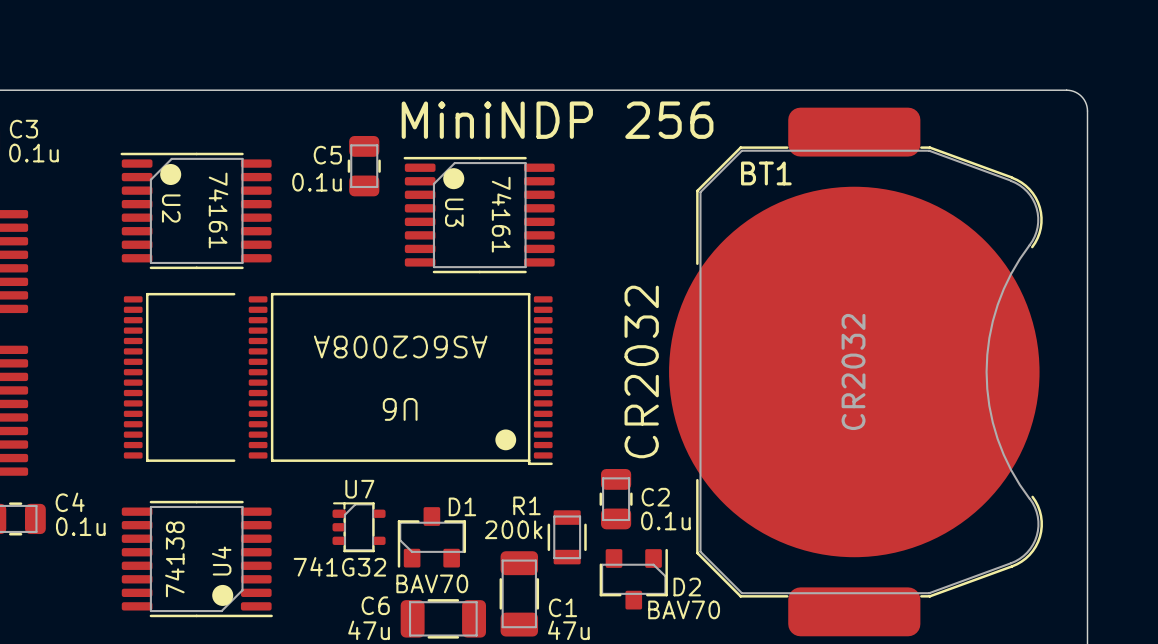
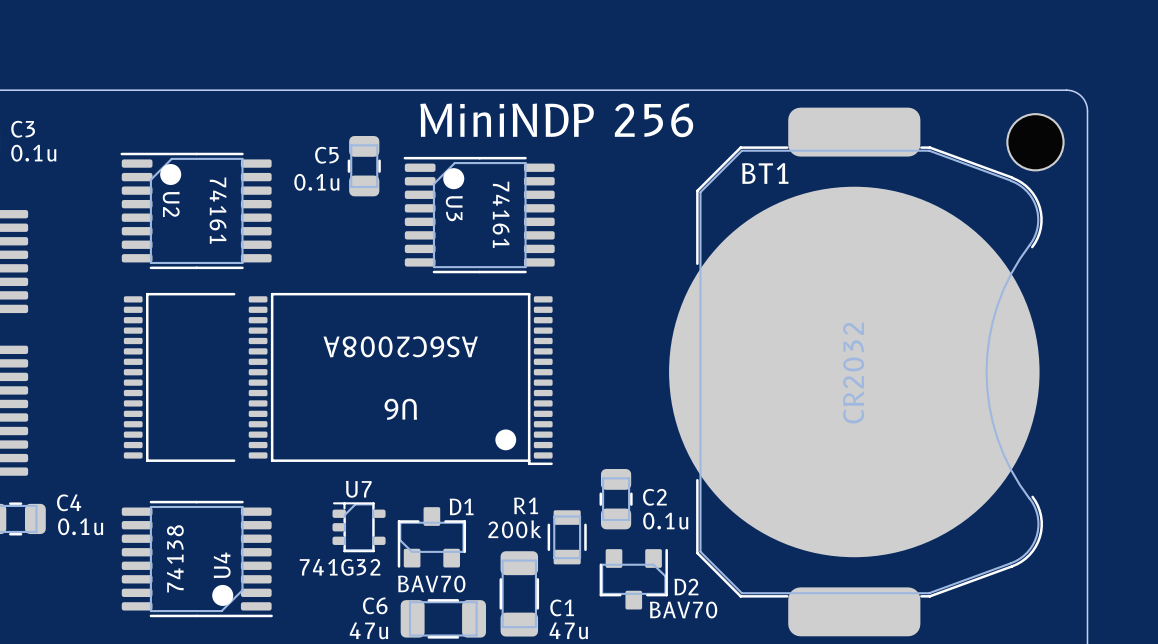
part: none -> (1035, 142)
text: CR2032 (641, 371) -> none

